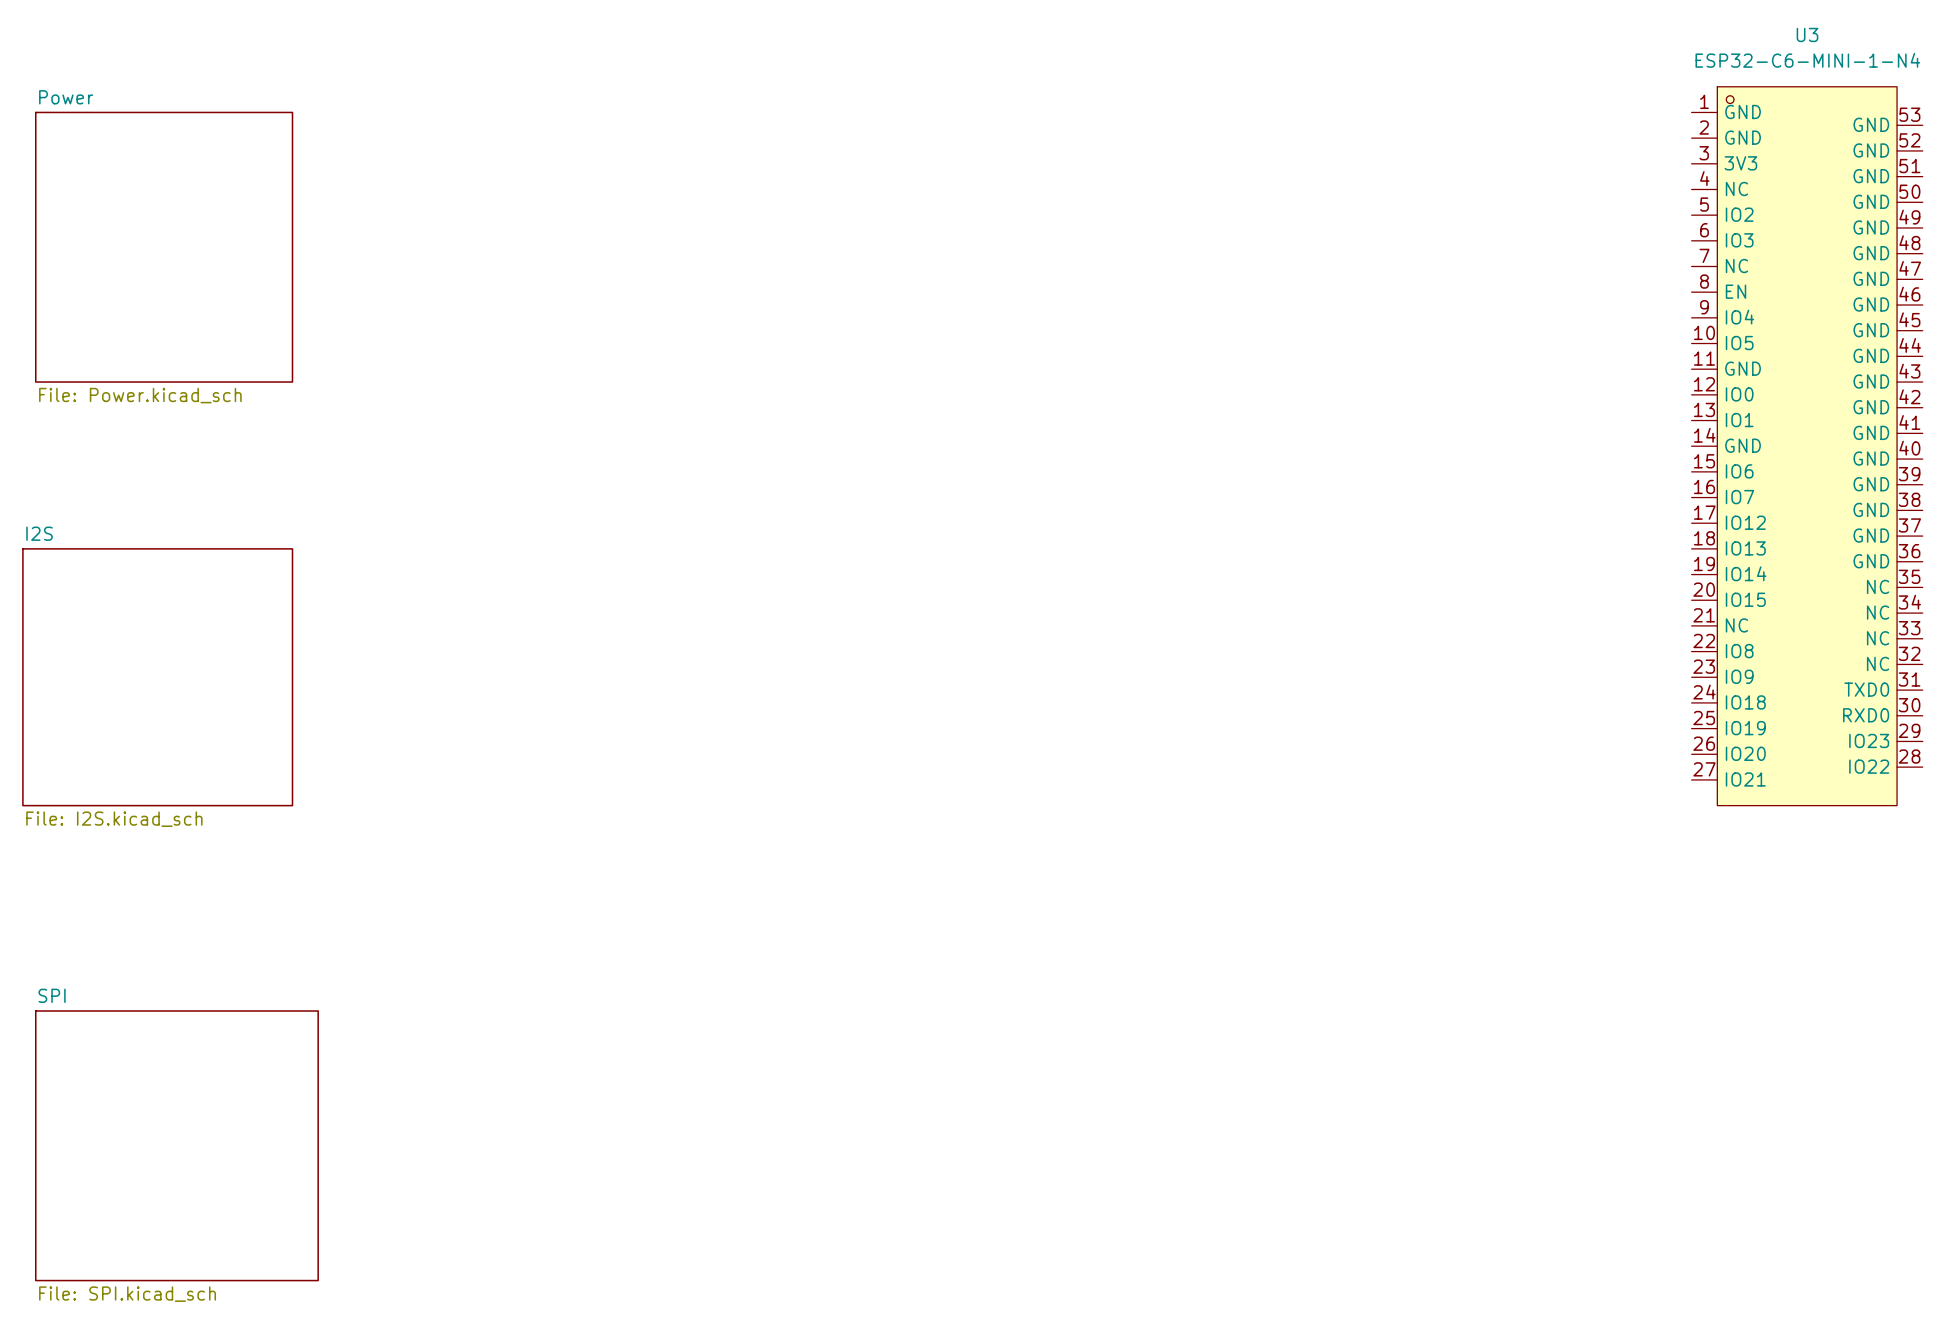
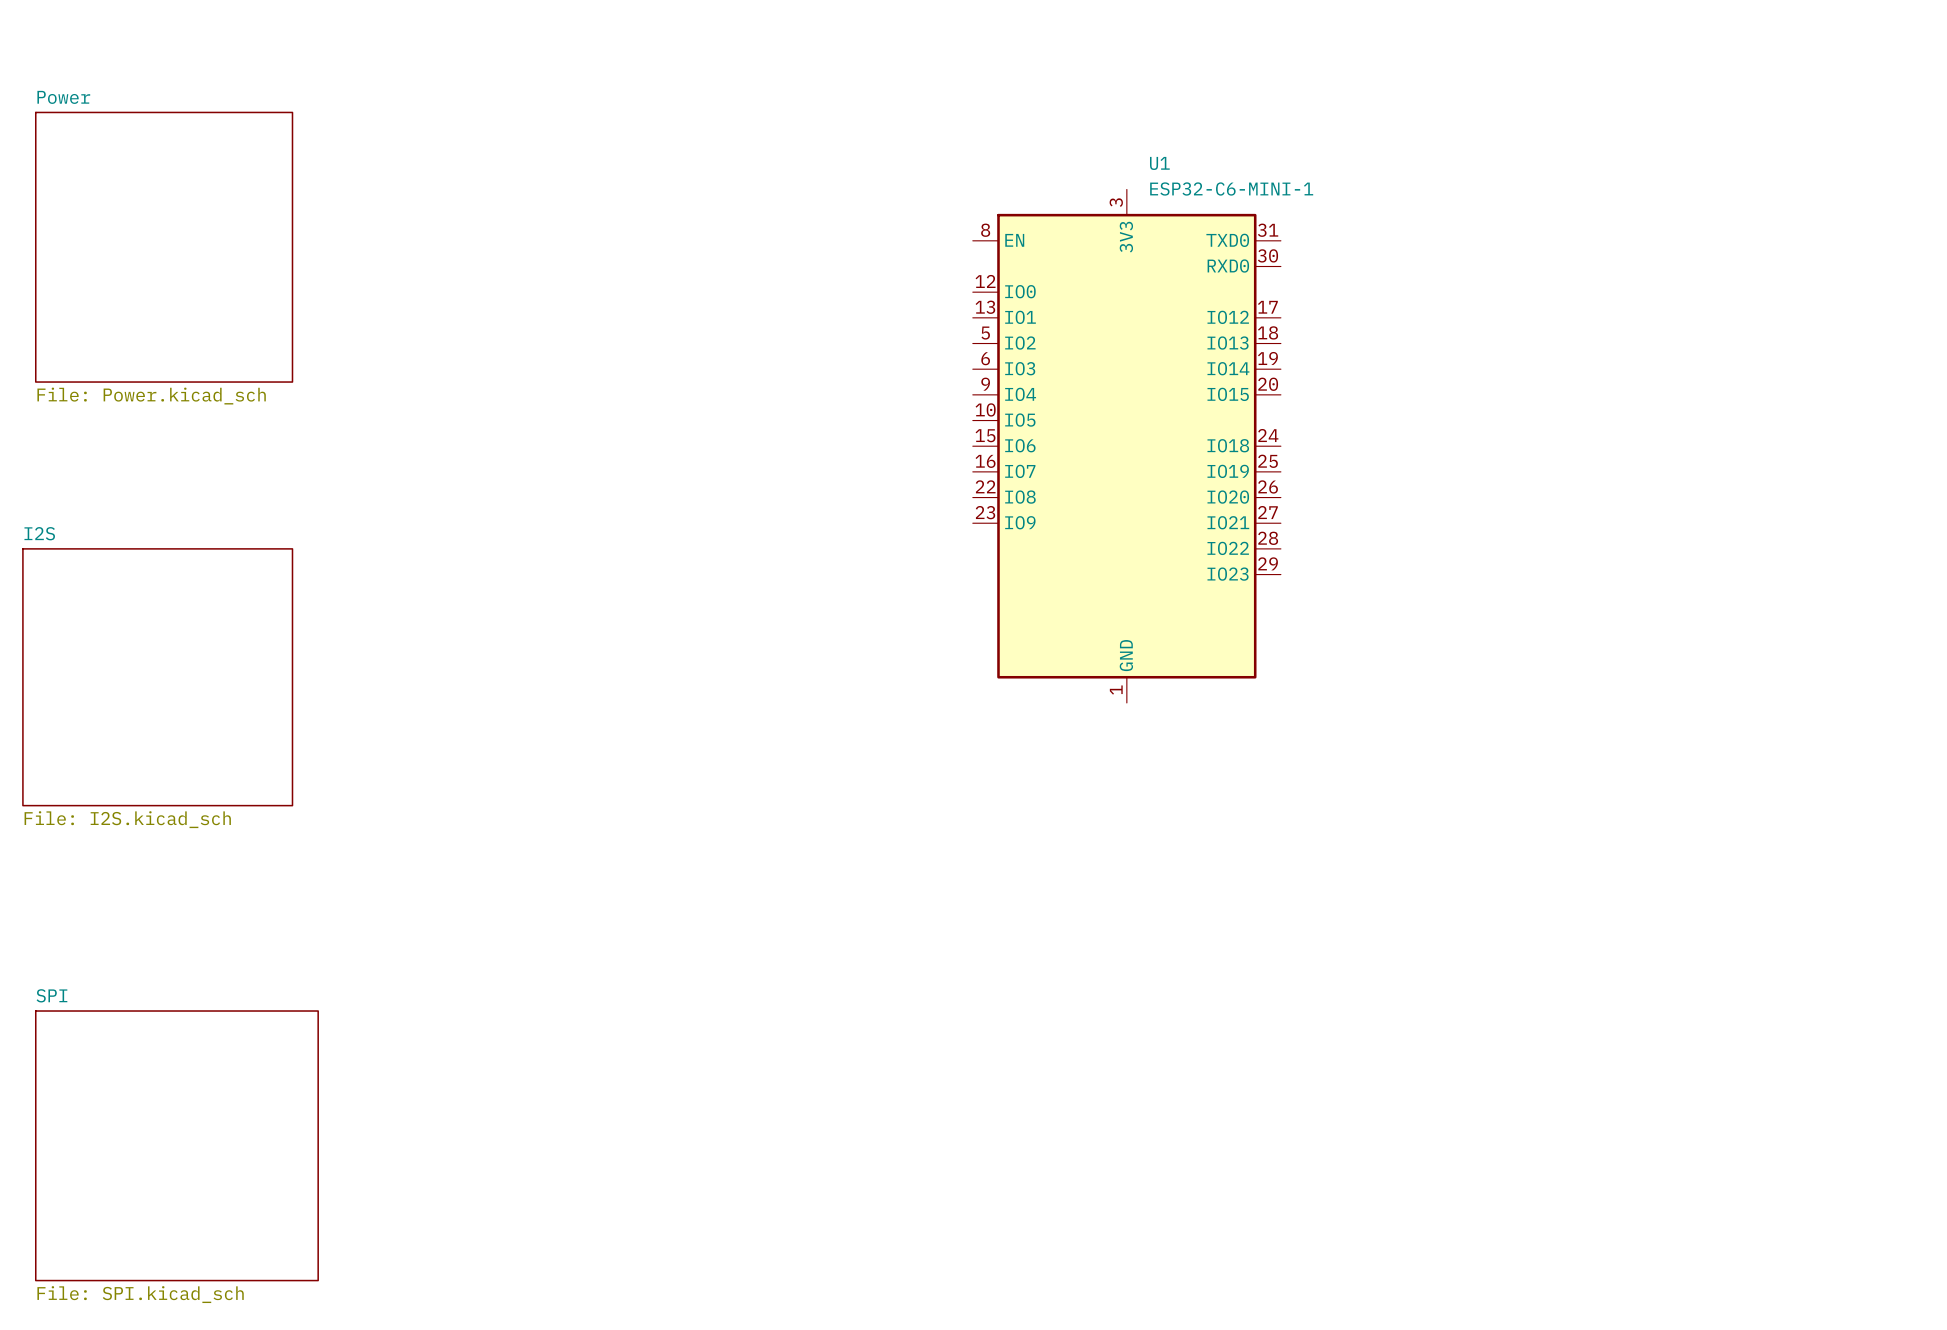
U1: none -> ESP32-C6-MINI-1 (1126, 446)
U3: ESP32-C6-MINI-1-N4 (1807, 446) -> none

